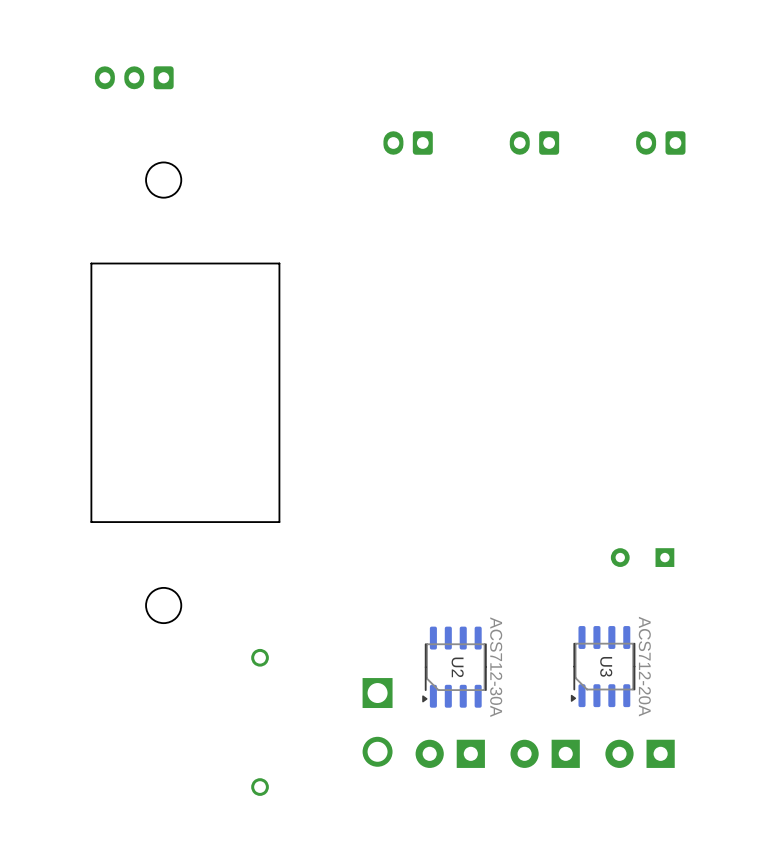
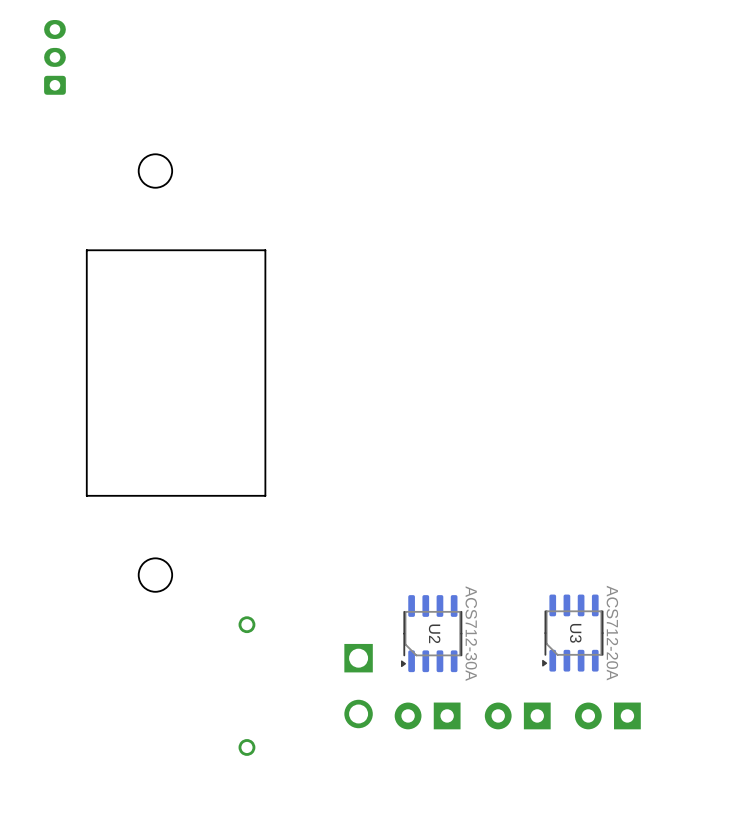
part rotation: 0° (134, 77) -> 90° clockwise (54, 57)
part position: (134, 77) -> (54, 57)
part: (408, 142) -> none
part: (534, 142) -> none
part: (660, 142) -> none
part: (642, 557) -> none

